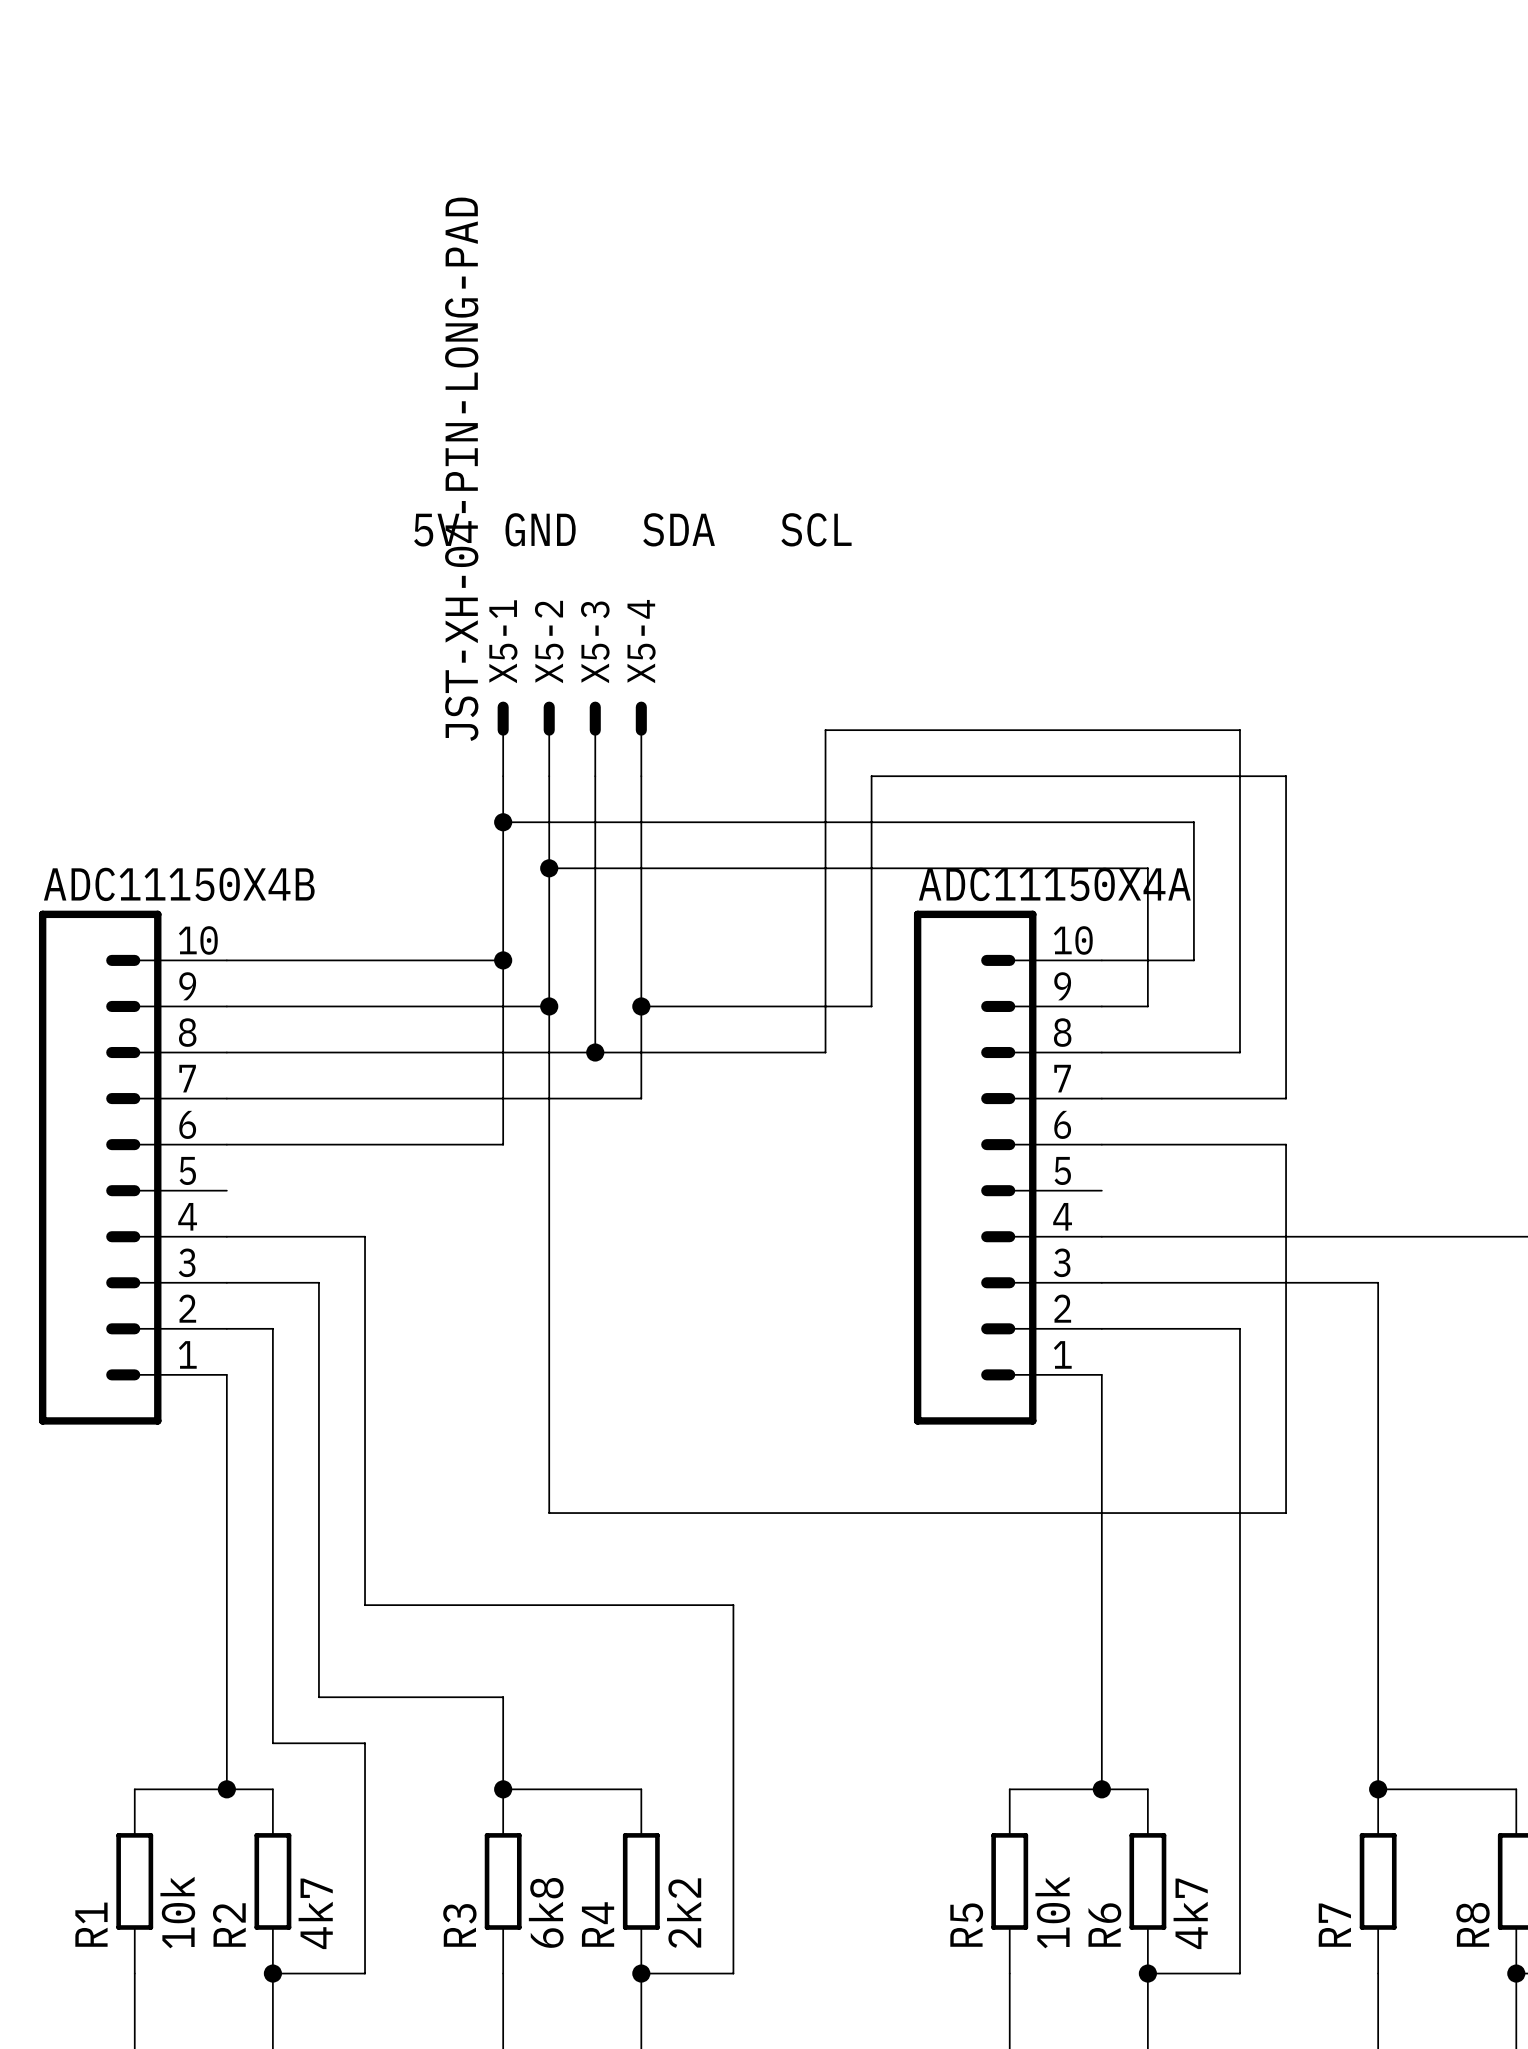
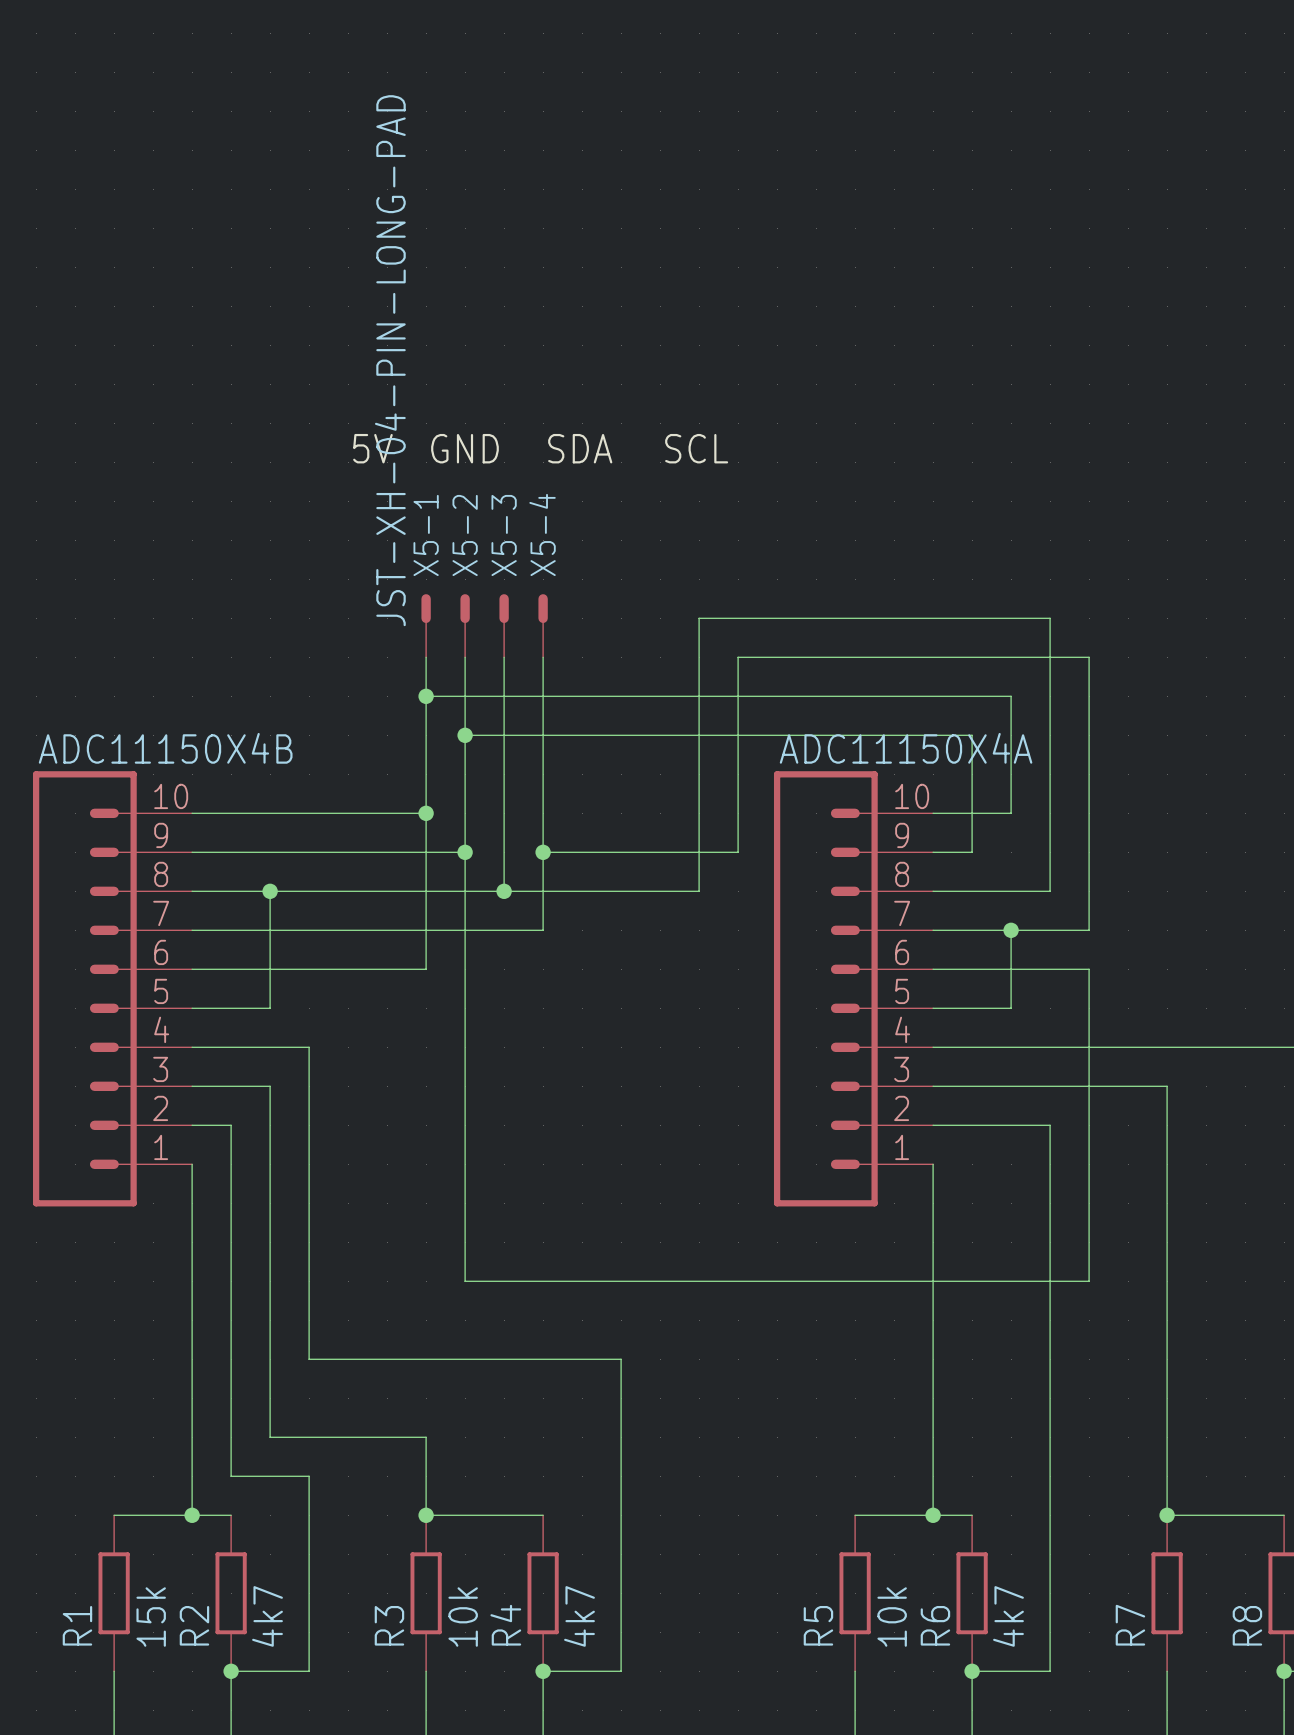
wire: none -> (270, 891) (270, 1008) (192, 1008)
junction: none -> (270, 891)
wire: none -> (1011, 930) (1011, 1008) (933, 1008)
junction: none -> (1011, 930)
R1 value: 10k (177, 1912) -> 15k (151, 1617)
R3 value: 6k8 (546, 1912) -> 10k (463, 1617)
R4 value: 2k2 (684, 1913) -> 4k7 (579, 1616)

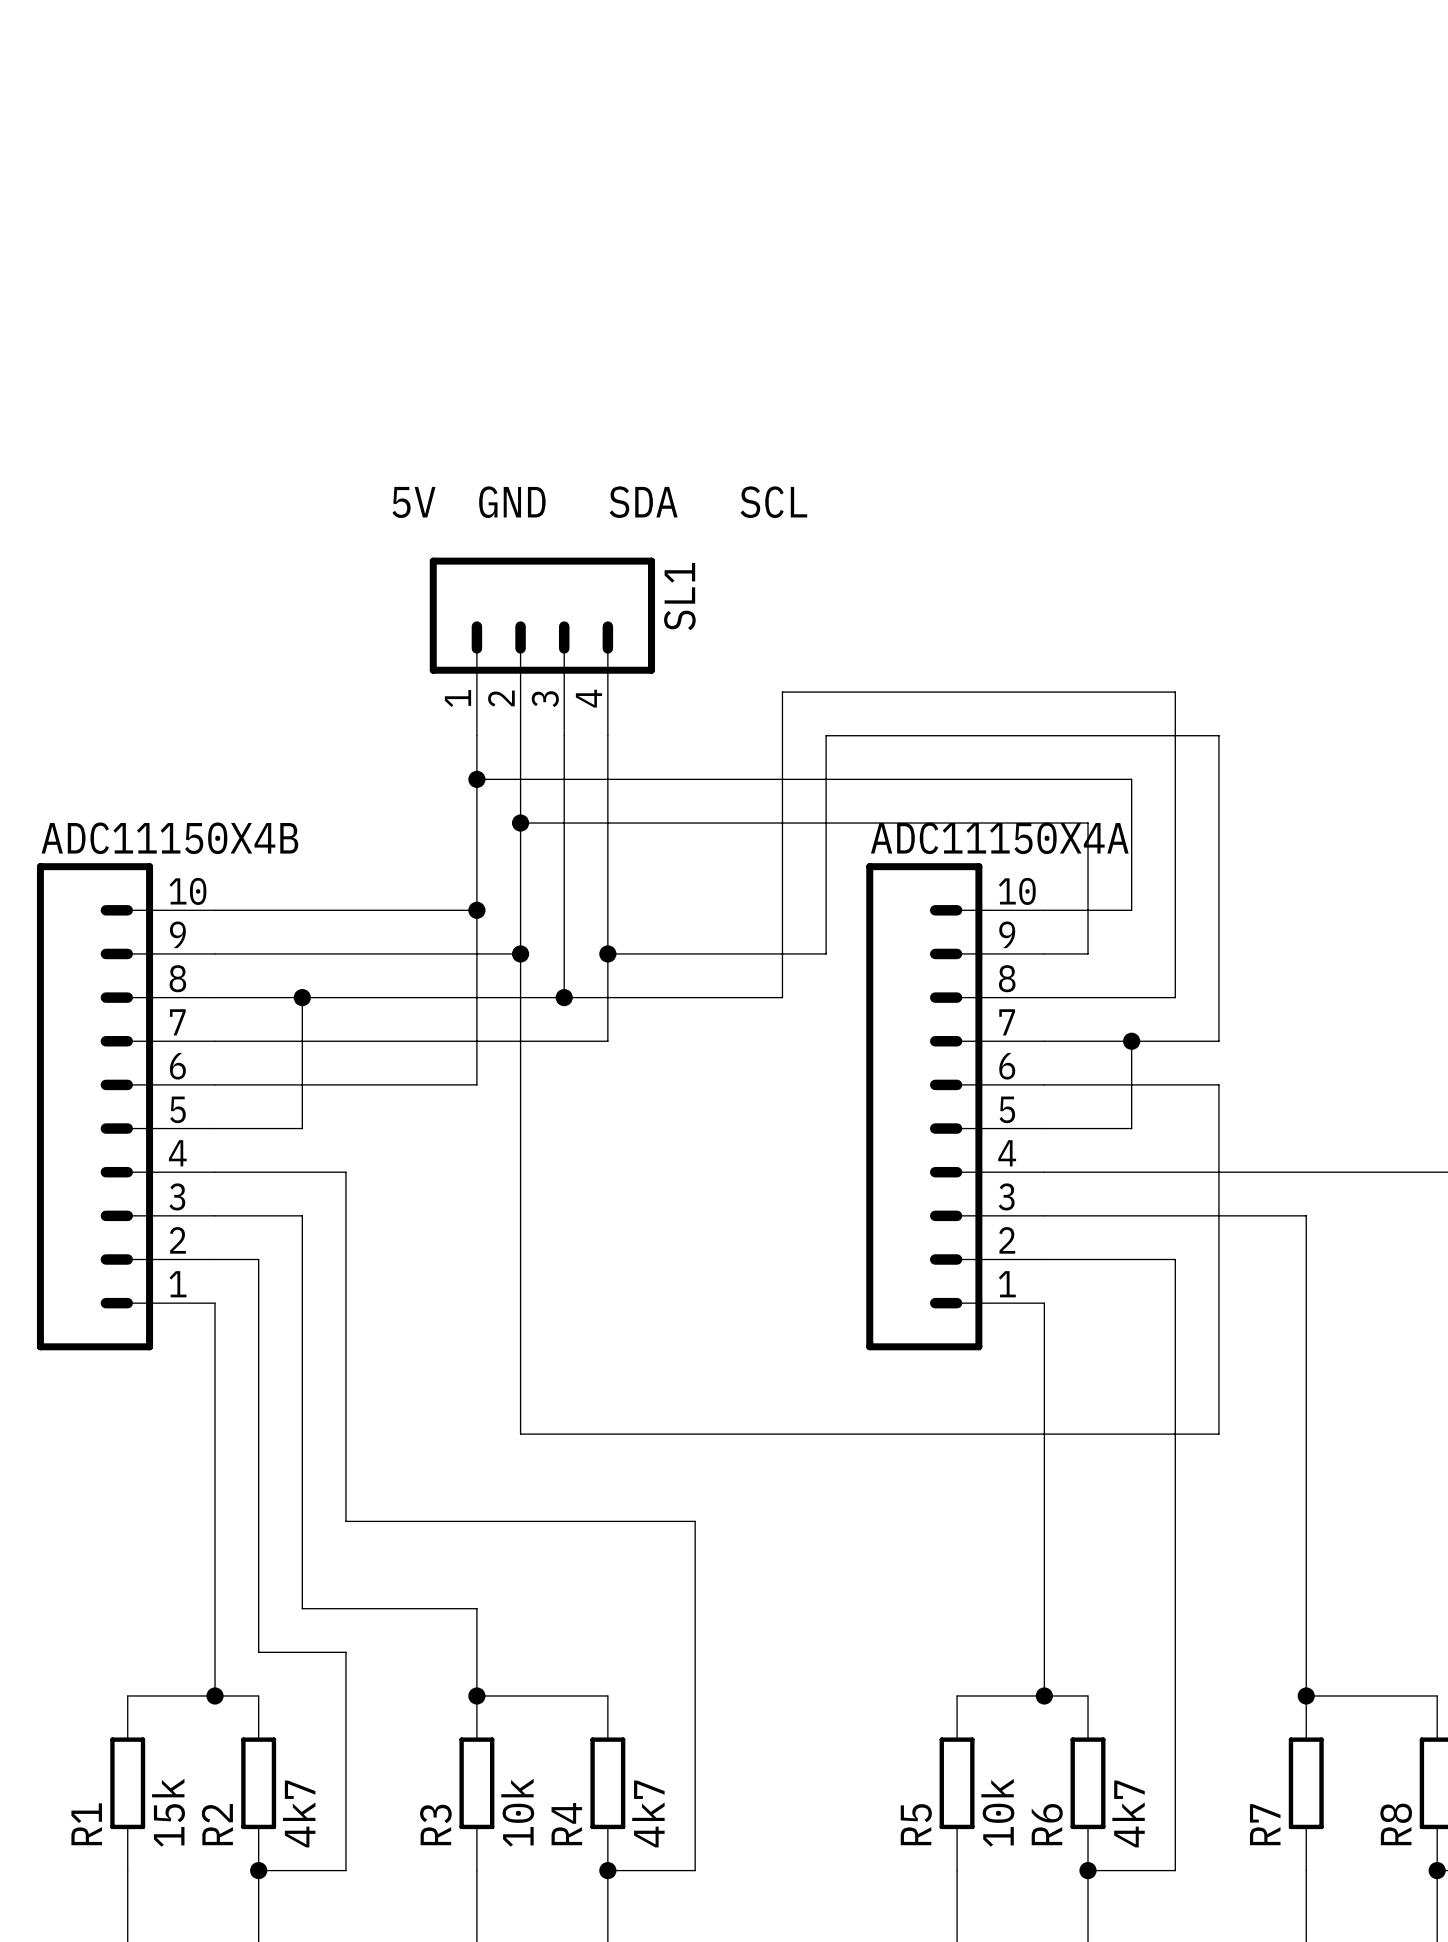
SL1: none -> (542, 646)
X5-1: JST-XH-04-PIN-LONG-PAD (426, 625) -> none
X5-2: (465, 625) -> none
X5-3: (504, 625) -> none
X5-4: (543, 625) -> none

